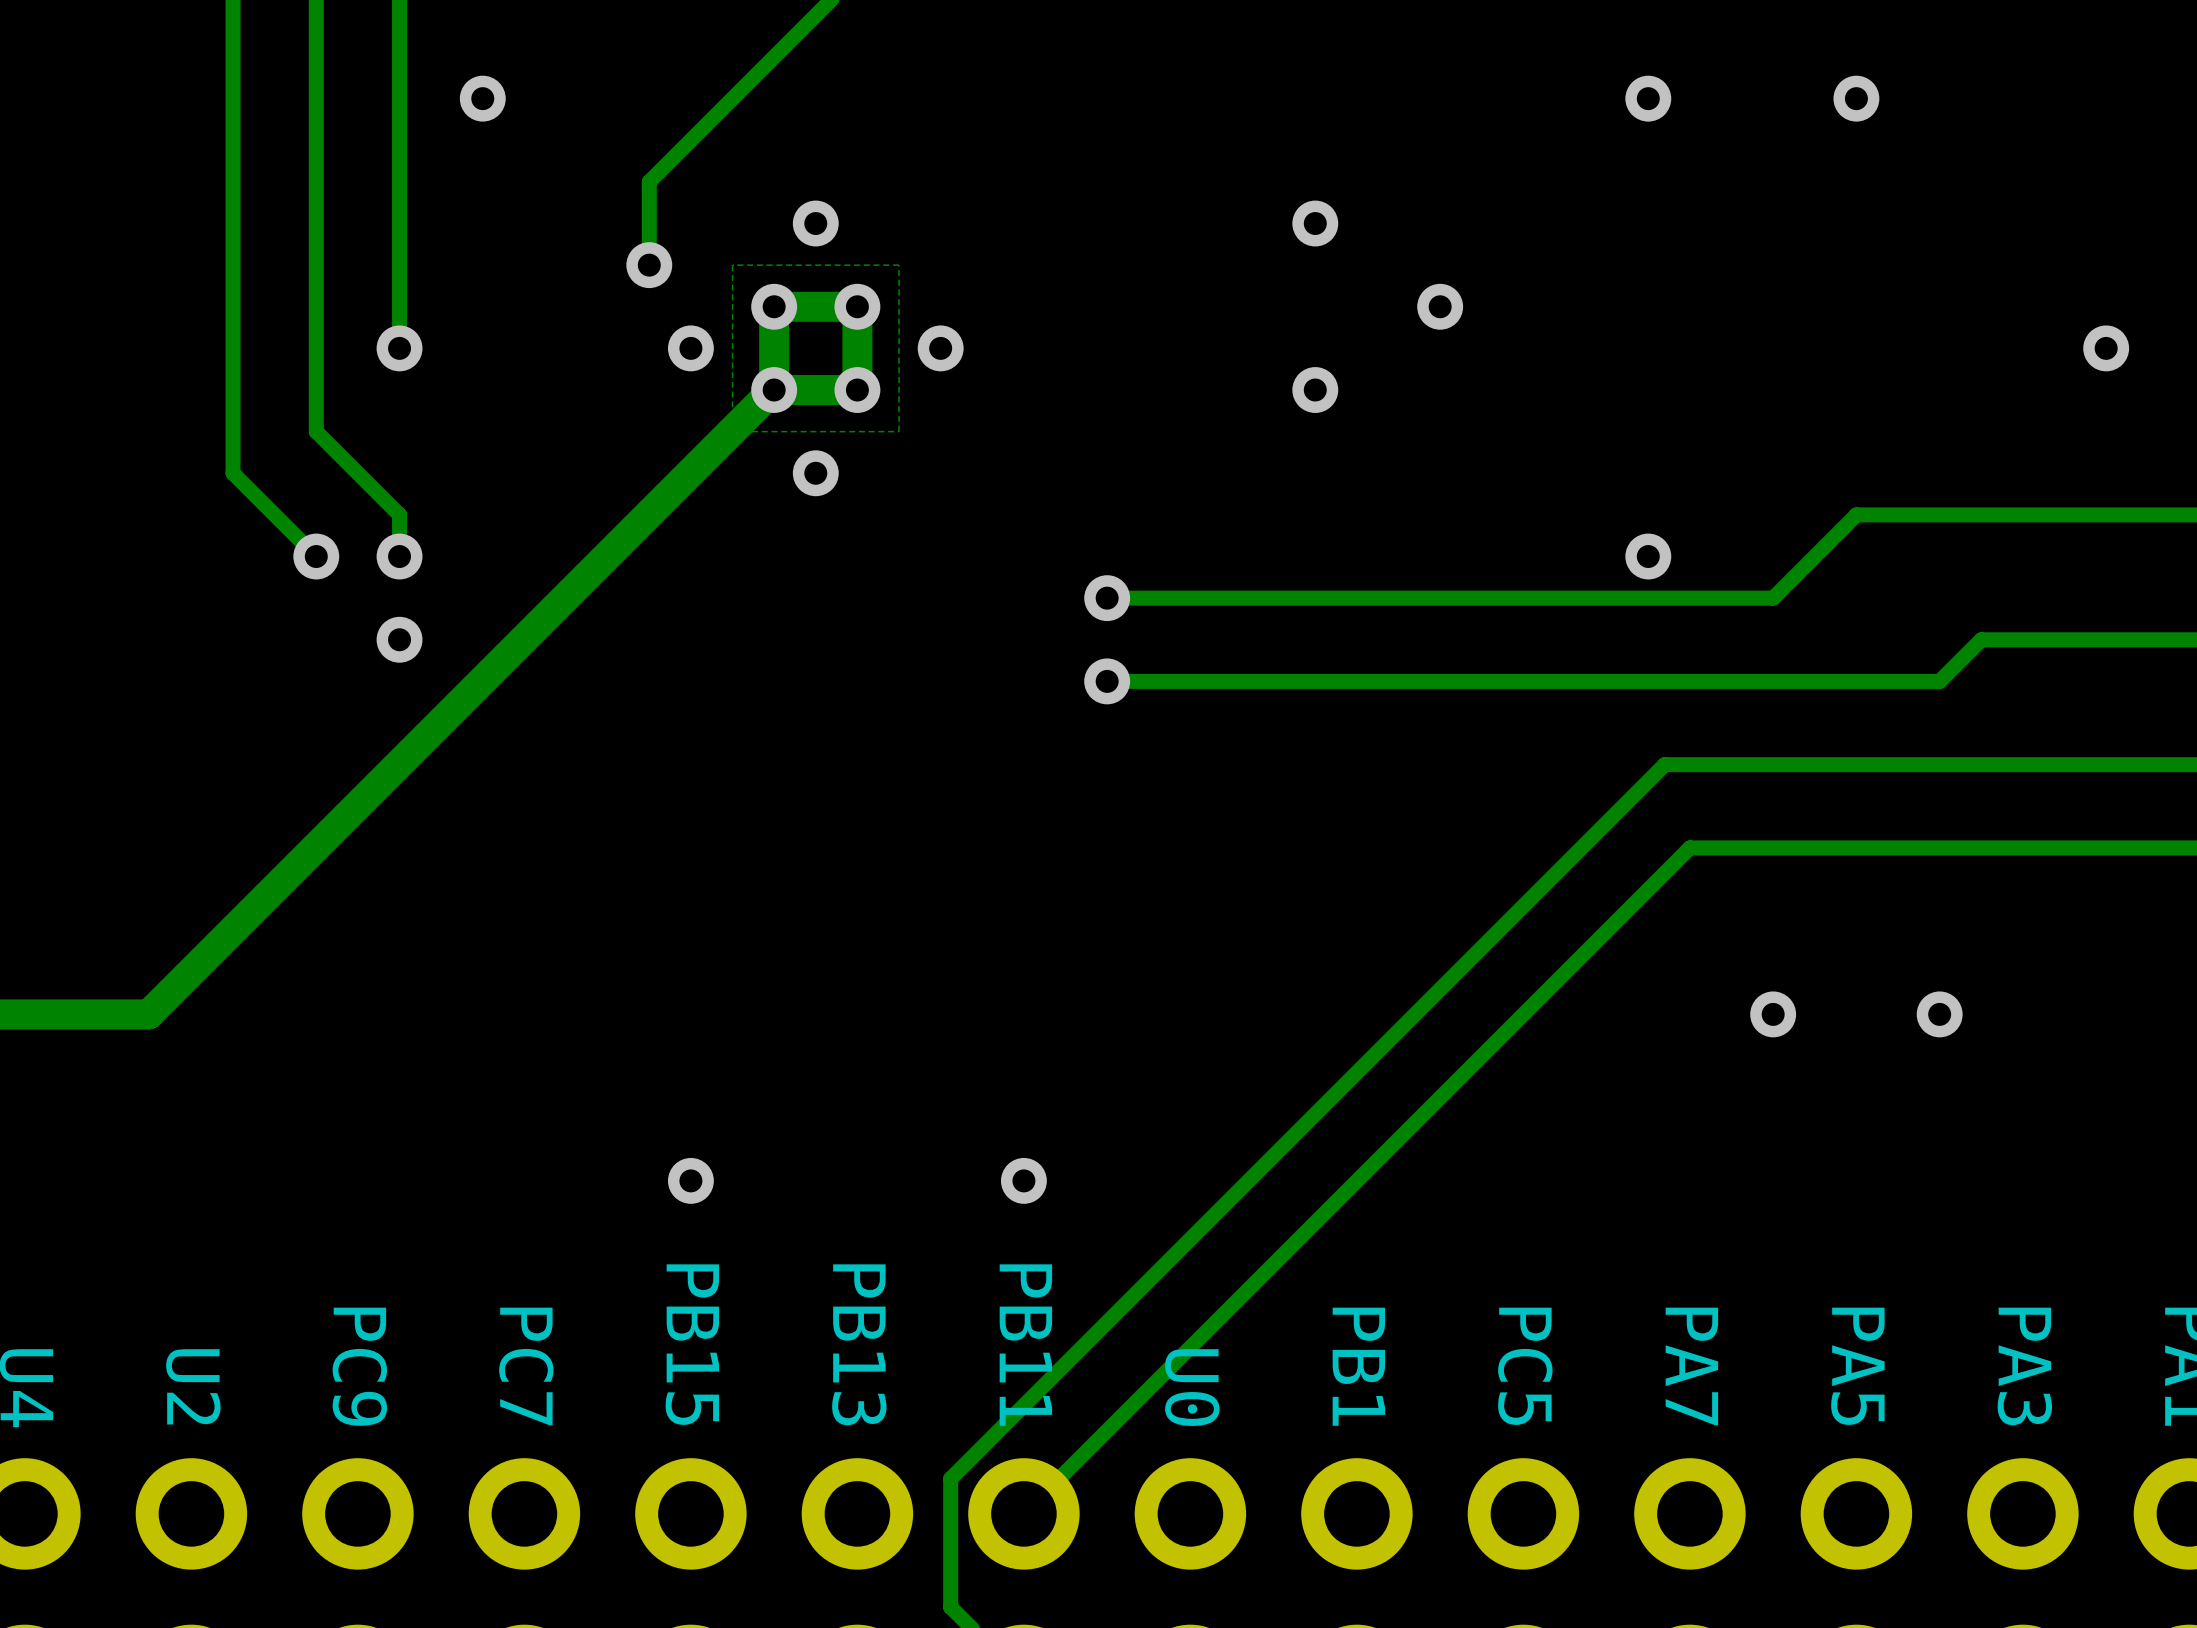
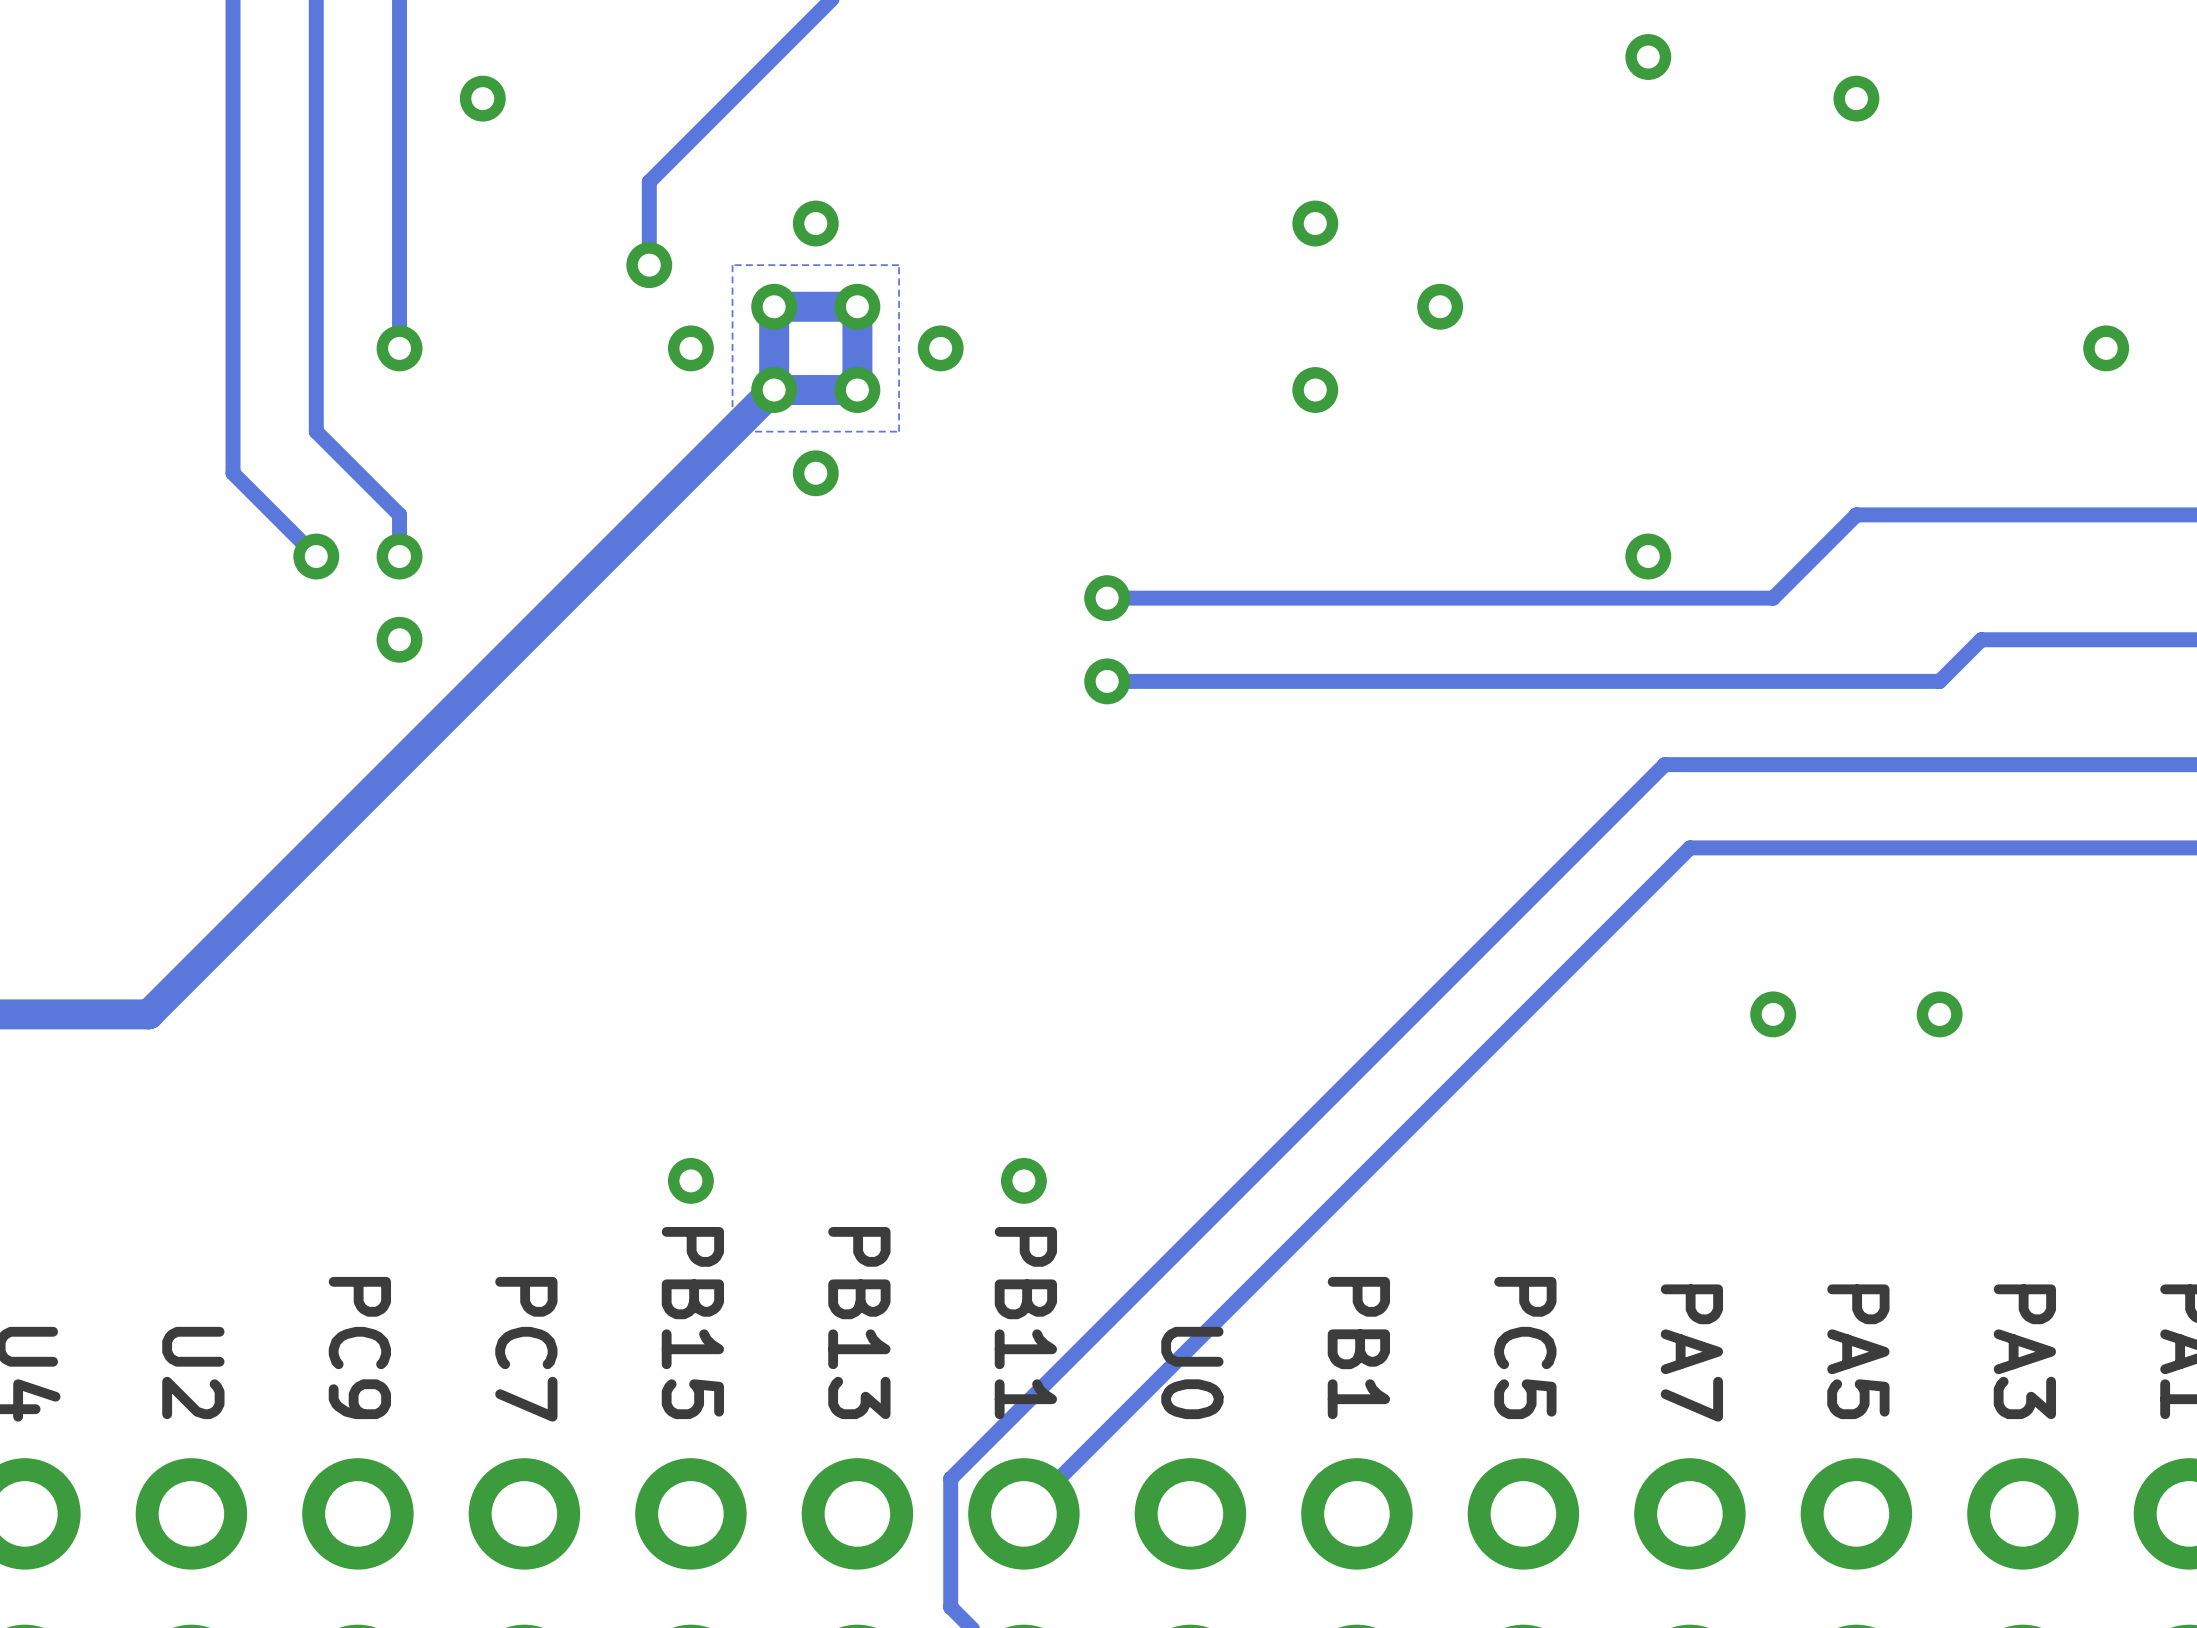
via position: (1648, 98) -> (1648, 57)

